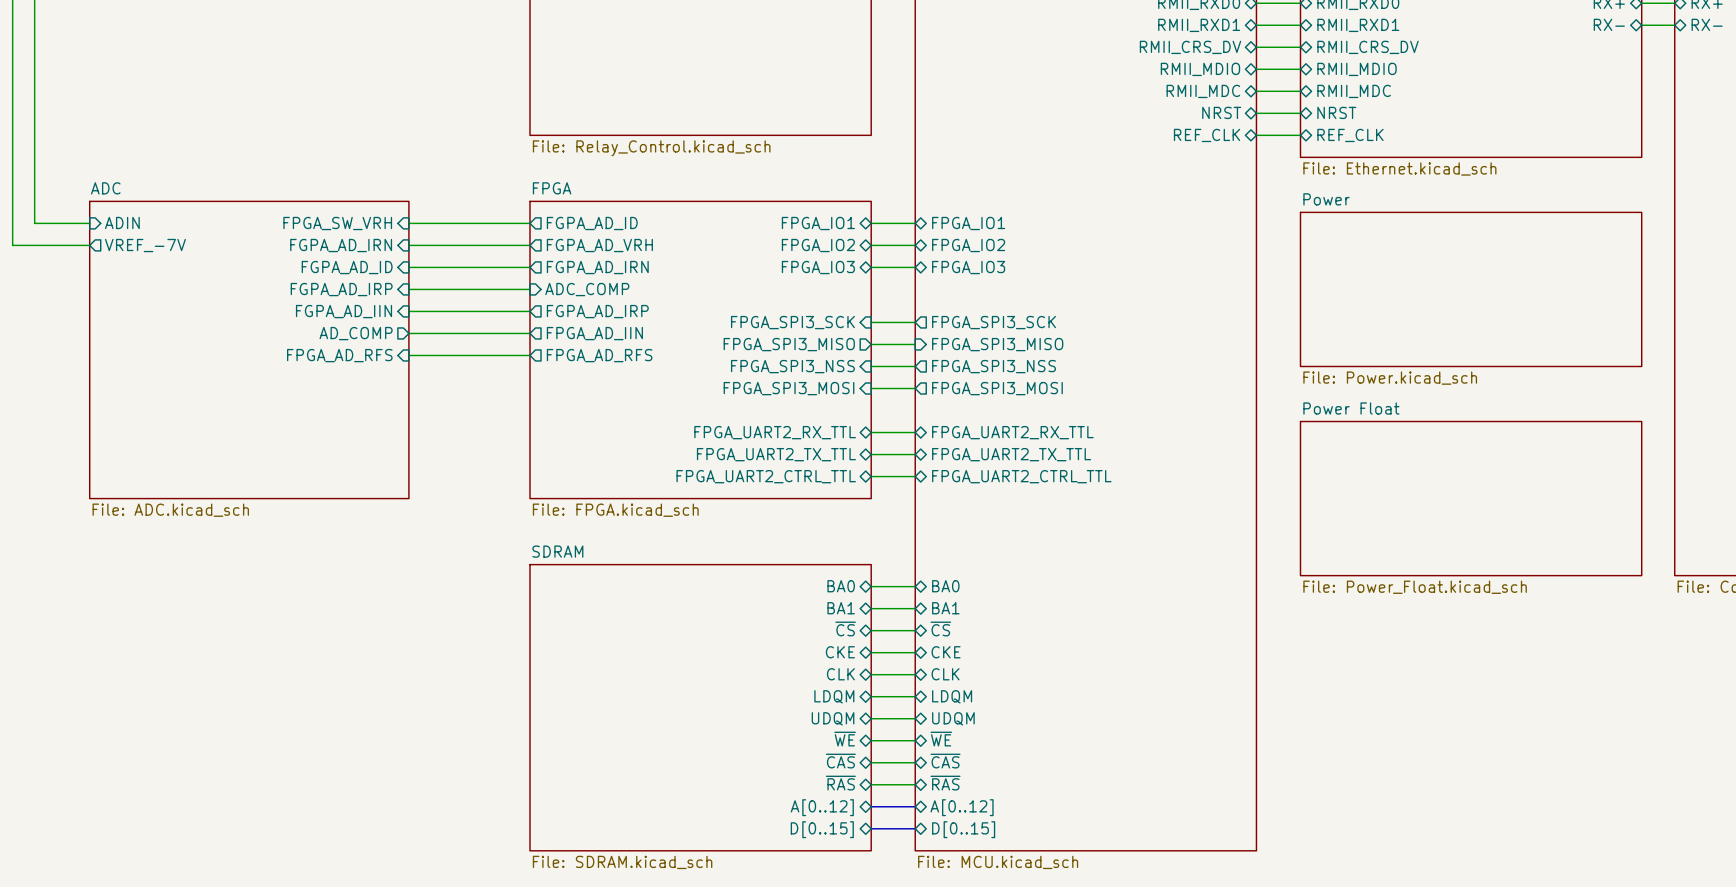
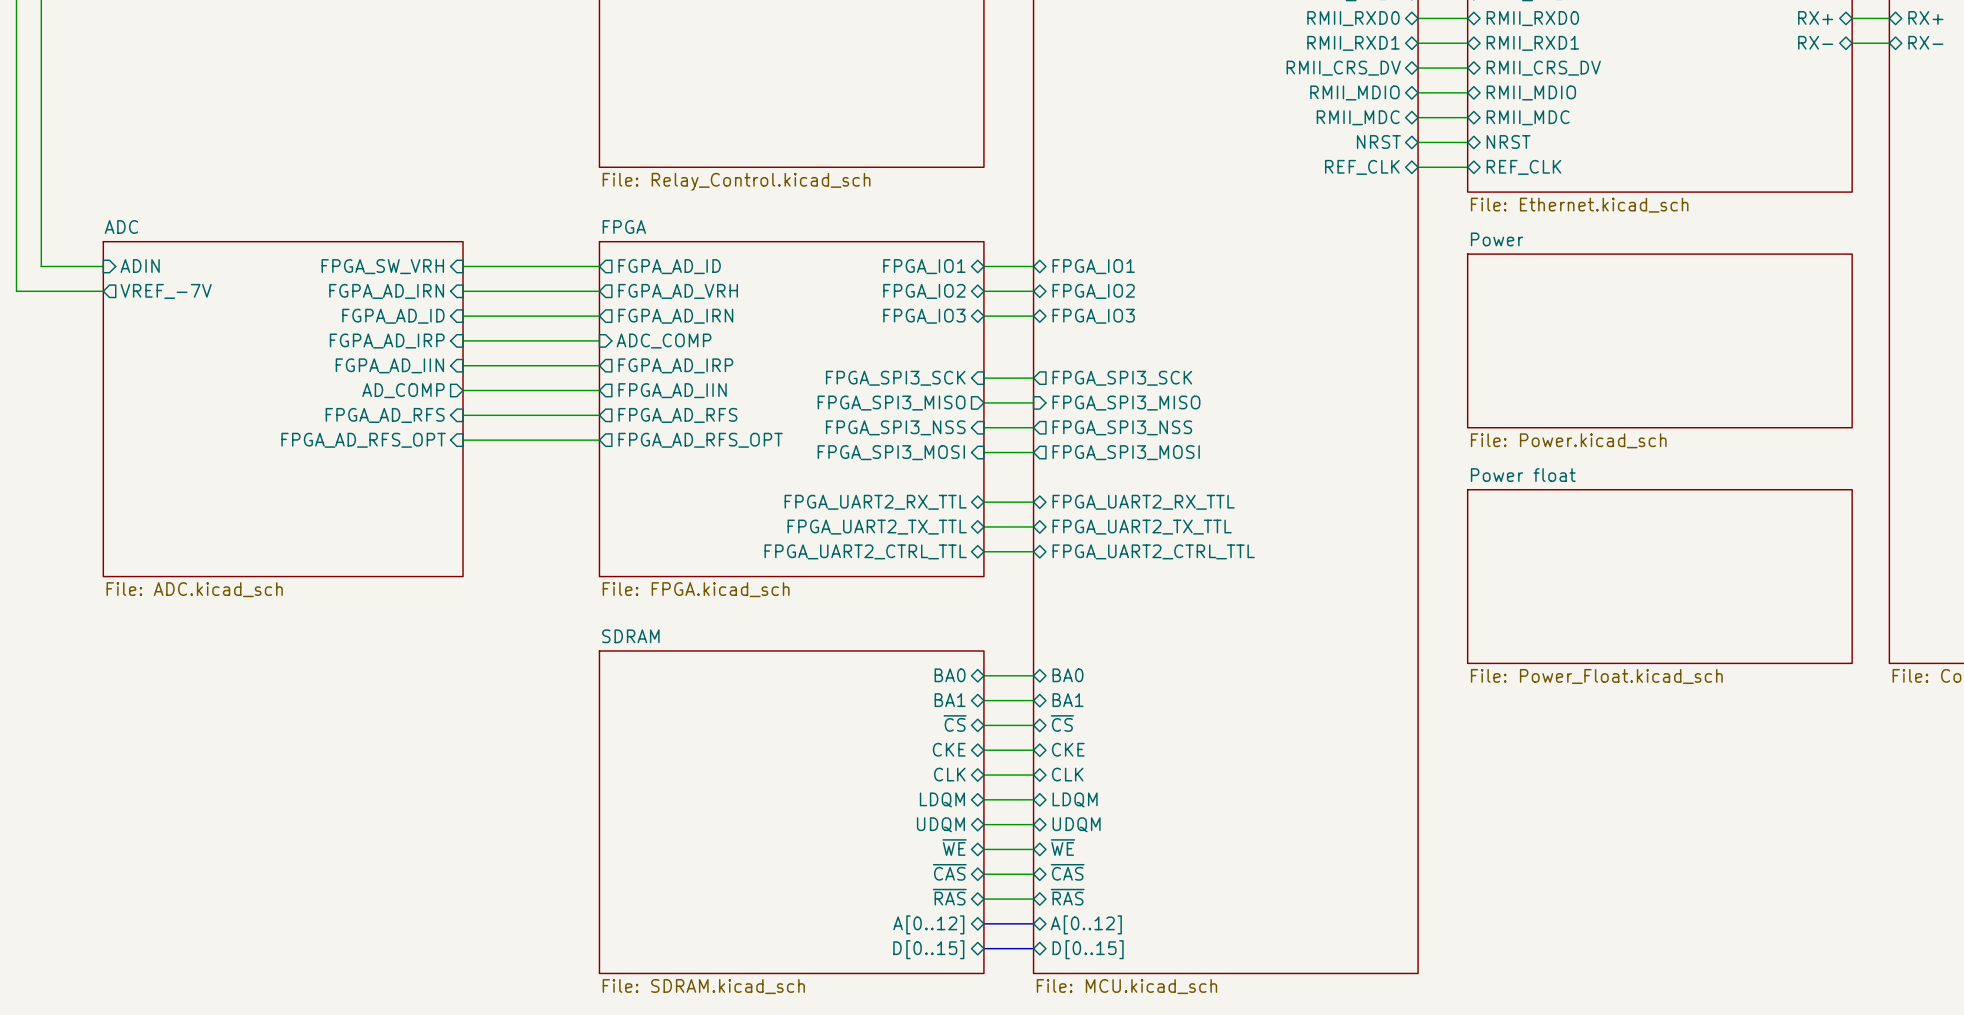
sheet pin: none -> FPGA_AD_RFS_OPT (363, 440)
wire: none -> (463, 440) (599, 440)
sheet pin: none -> FPGA_AD_RFS_OPT (700, 440)
sheet Power Float name: Power Float (1351, 408) -> Power float (1523, 475)

